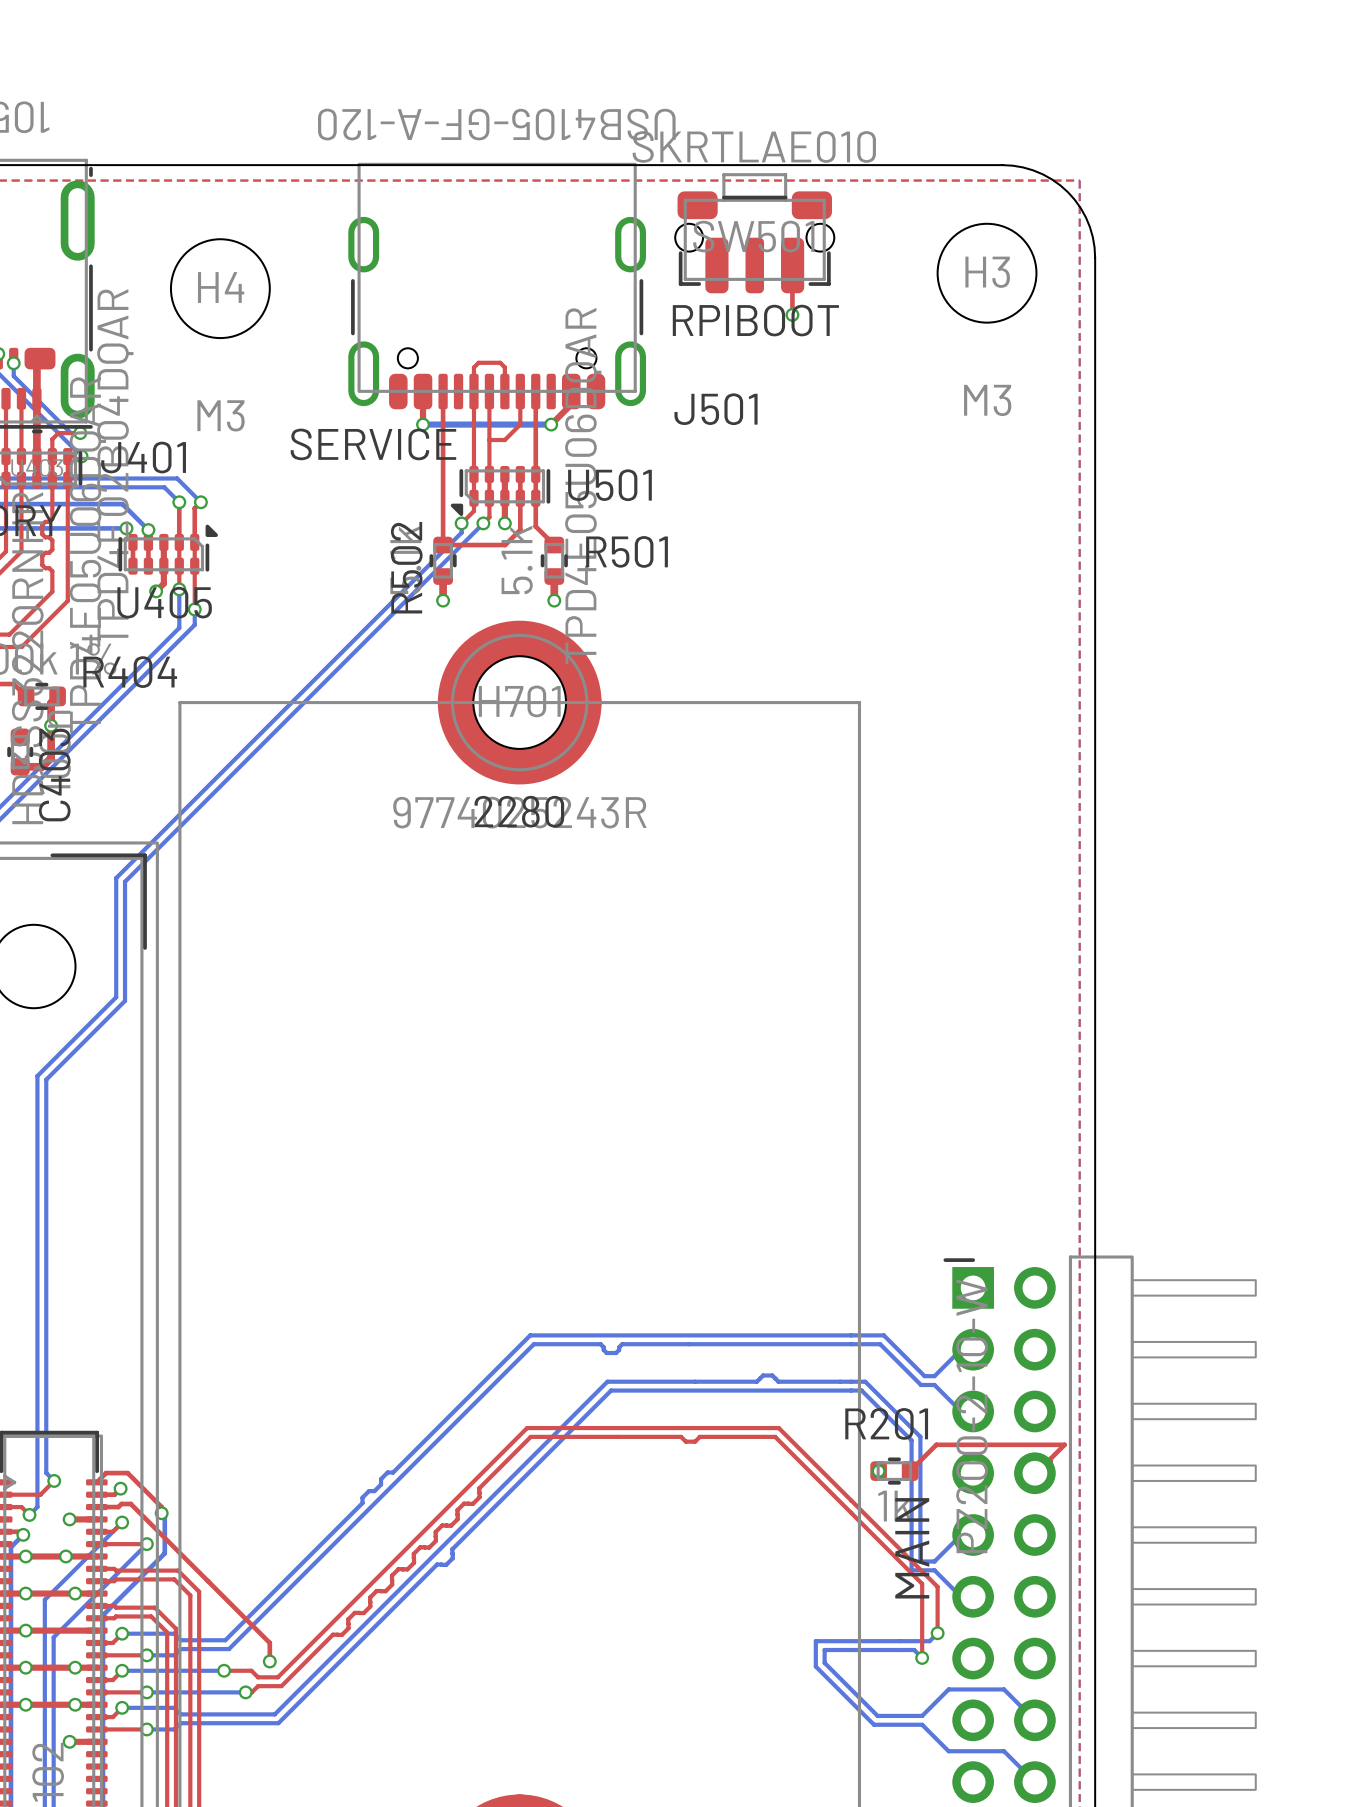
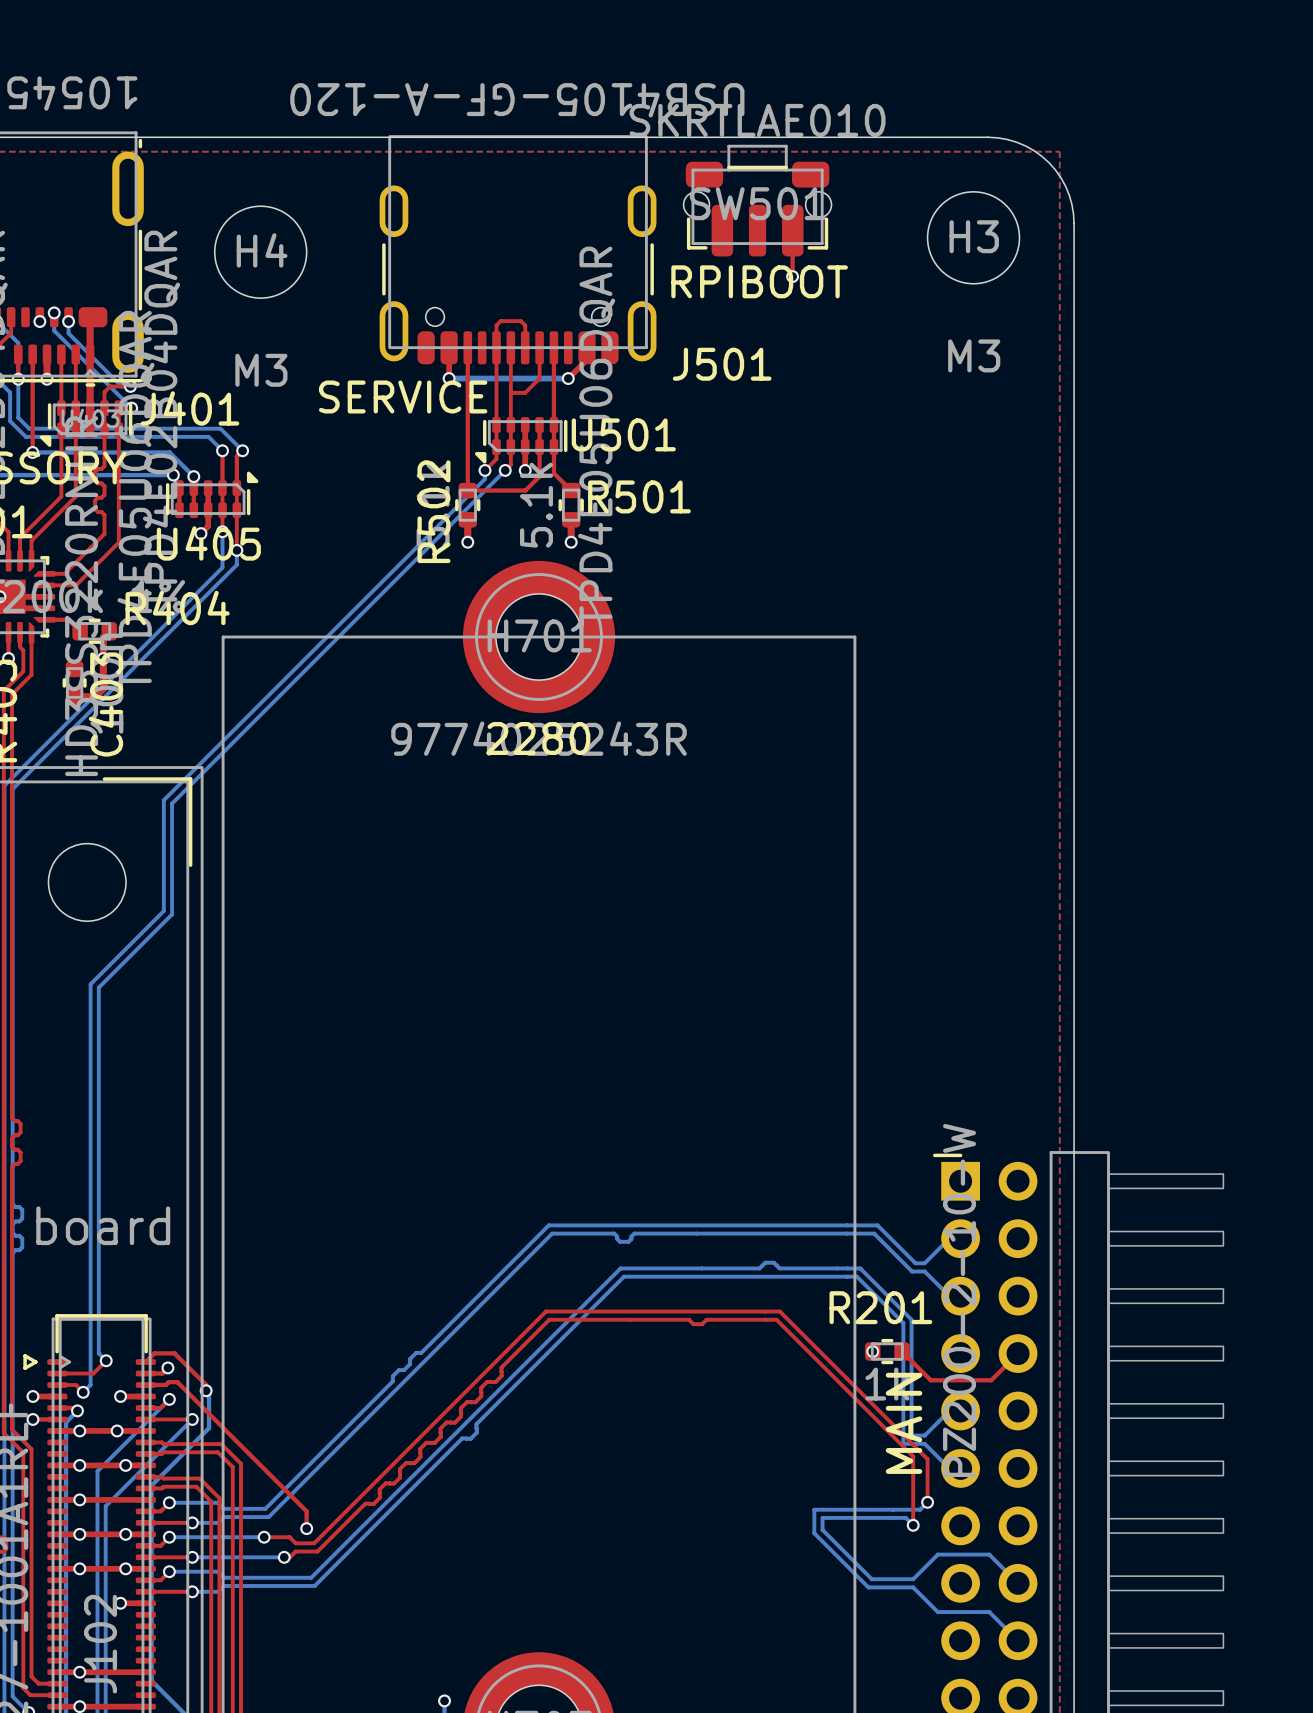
top track: (910, 1471) (936, 1444) (1064, 1444) (1050, 1458) (1050, 1477) -> (902, 1351) (930, 1380) (991, 1380) (1018, 1353)

